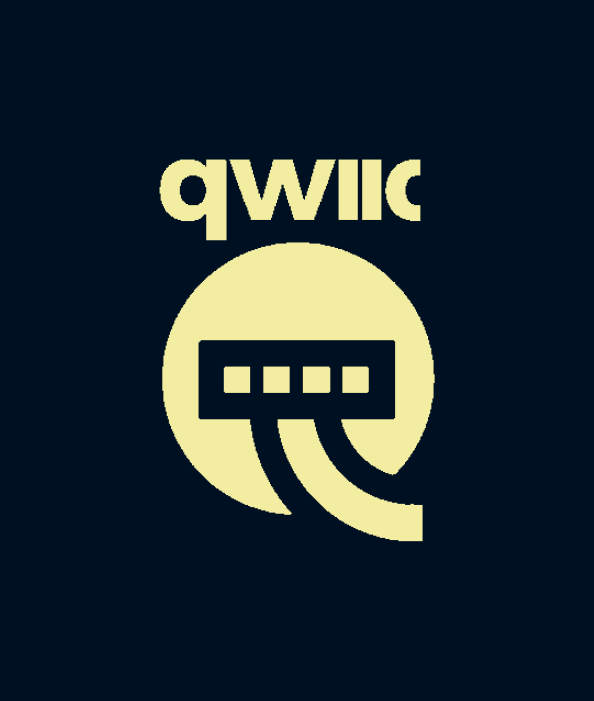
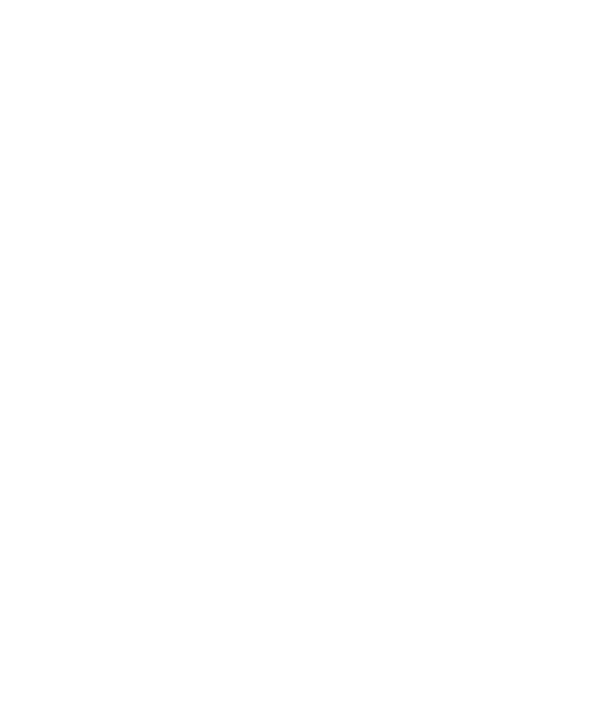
drawing: [159, 159, 435, 542] -> none

